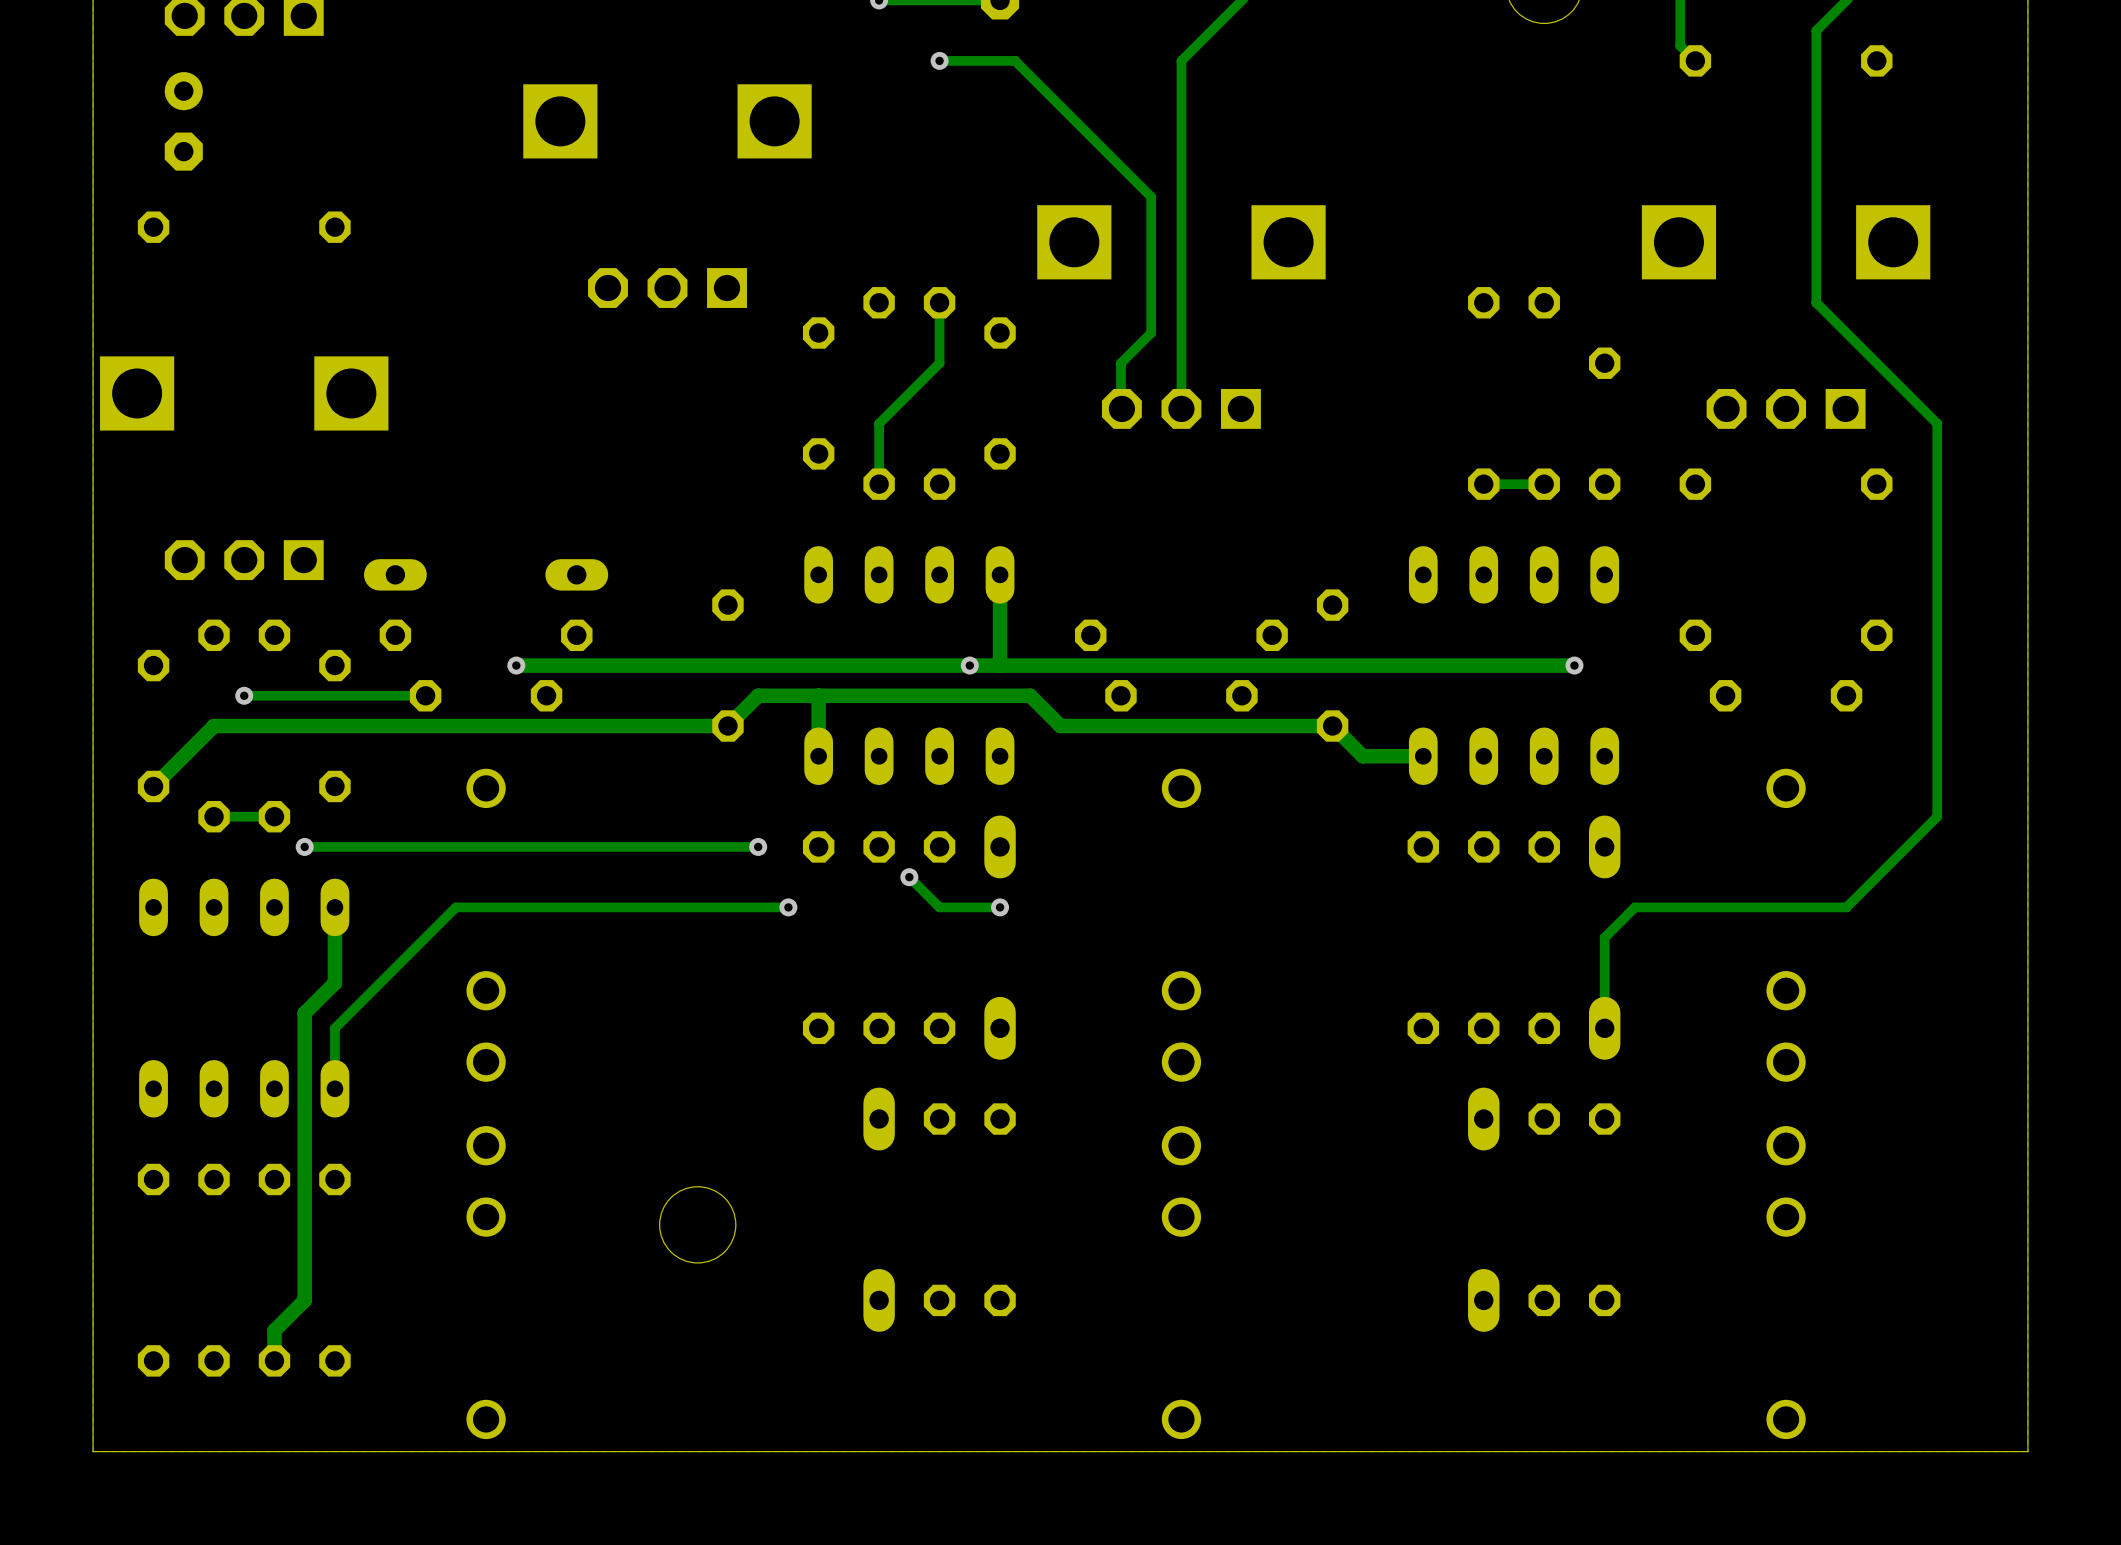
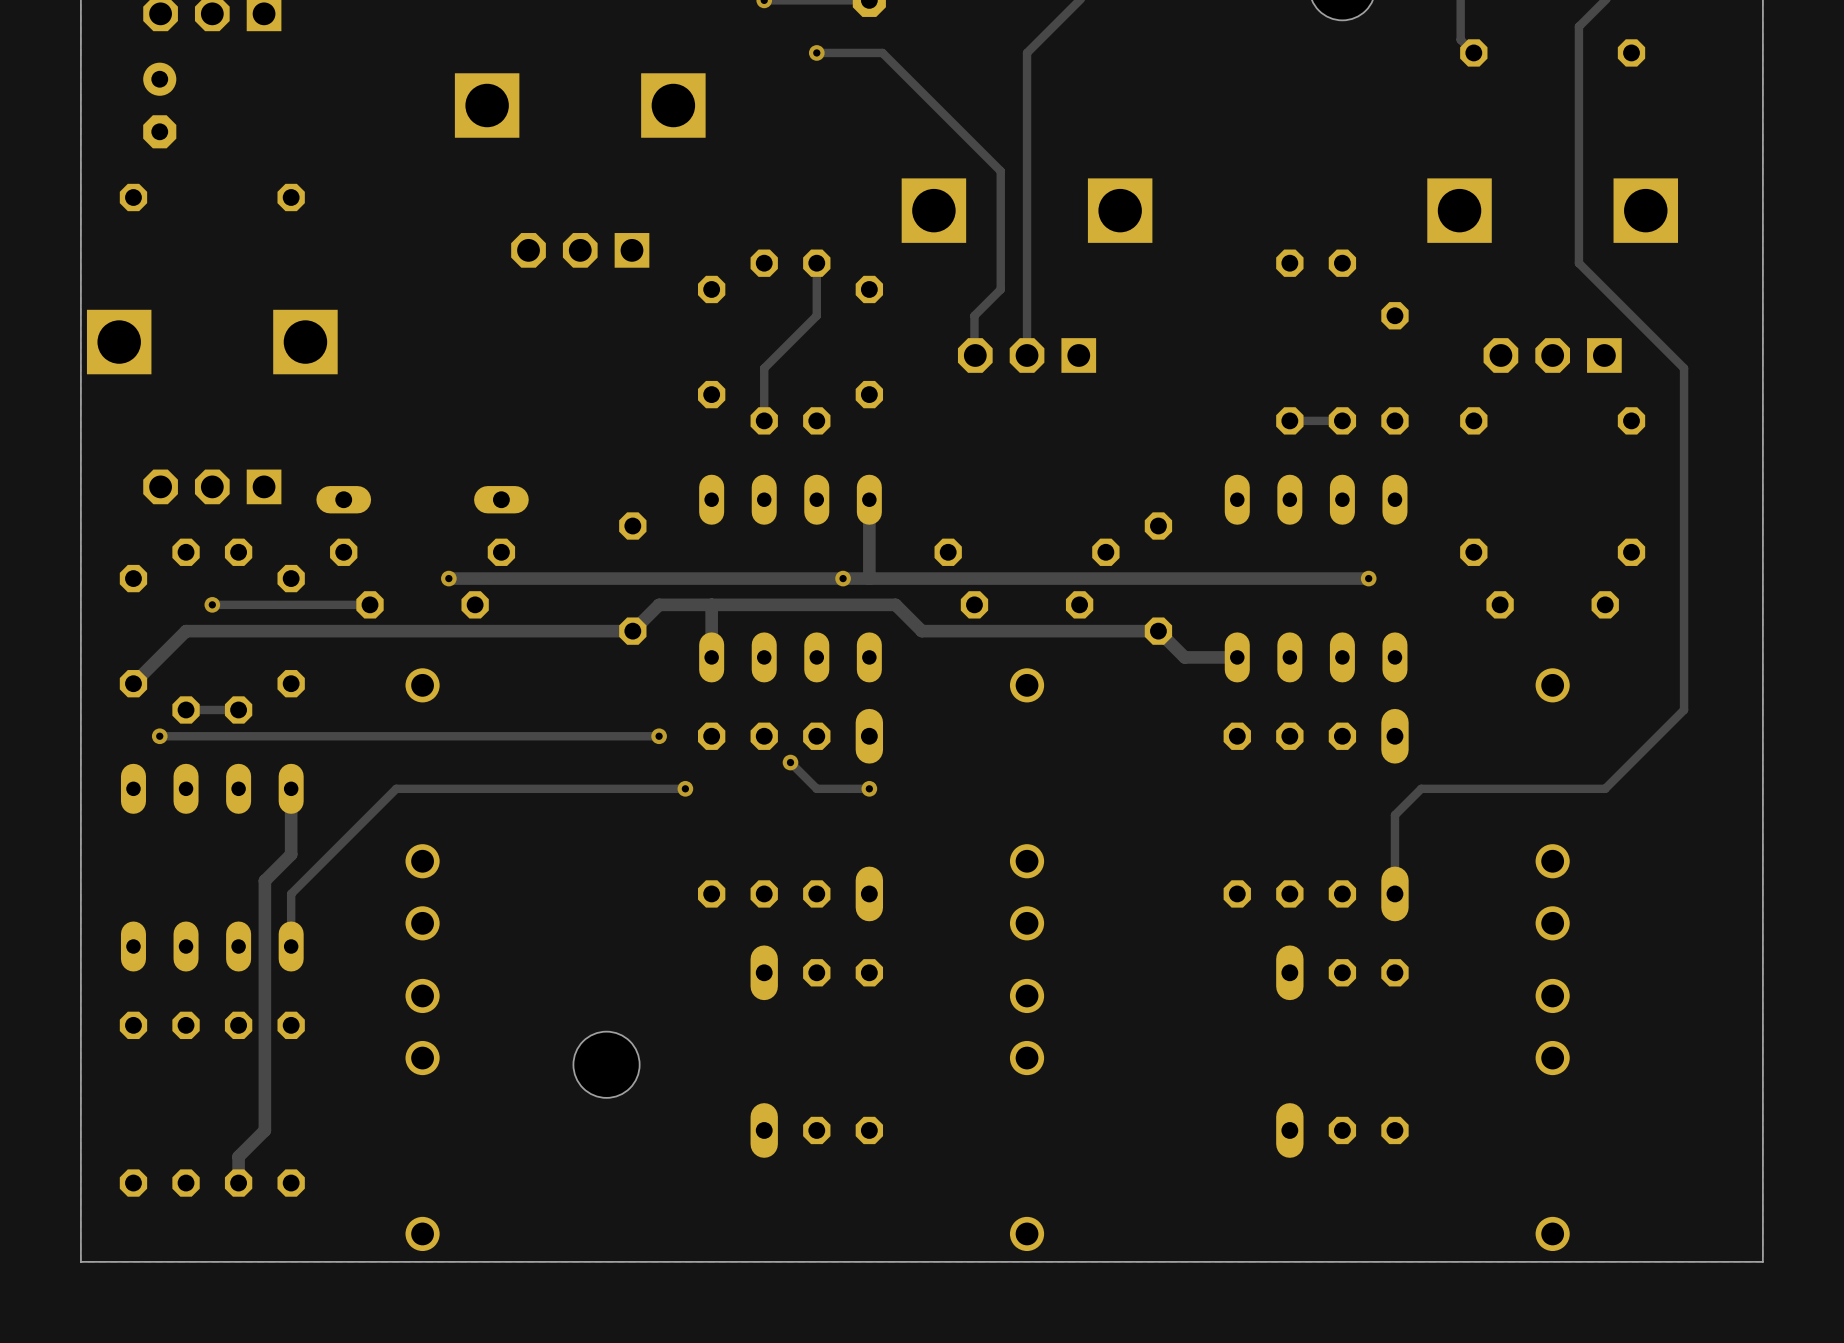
track: none -> (264, 736) (159, 736)
via position: (304, 846) -> (159, 736)

